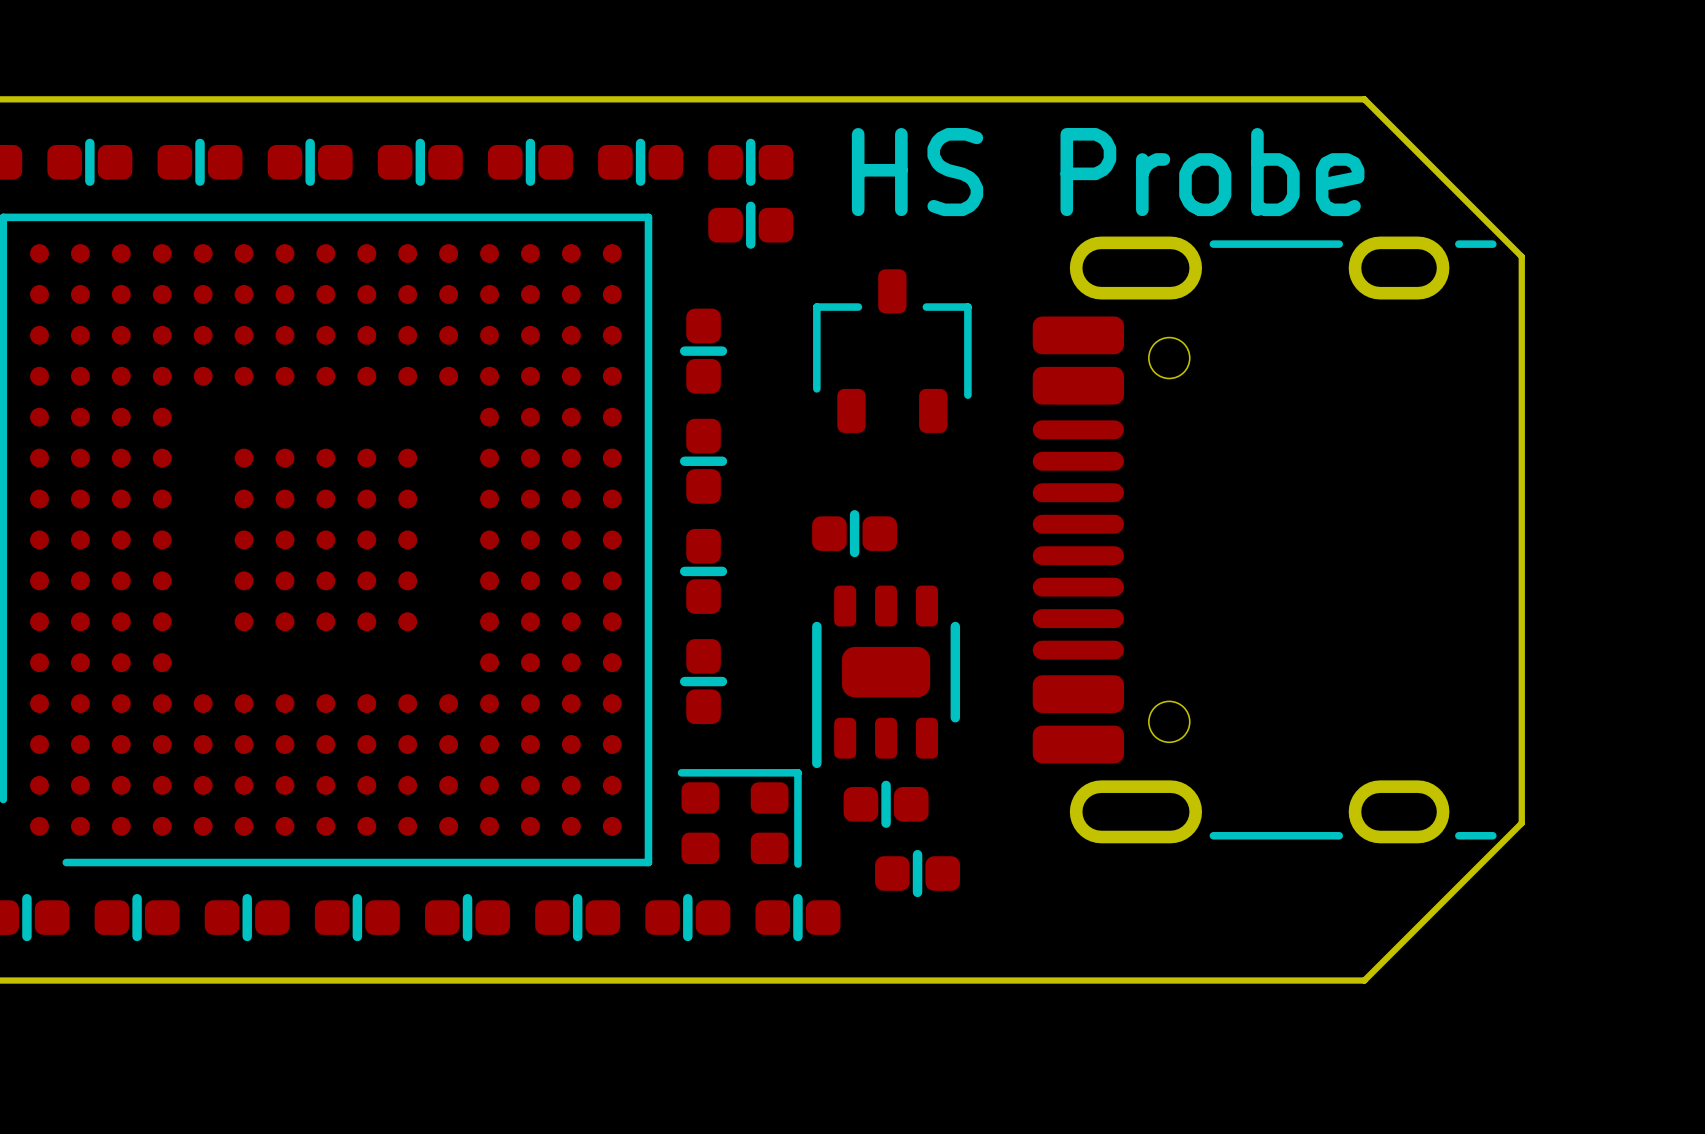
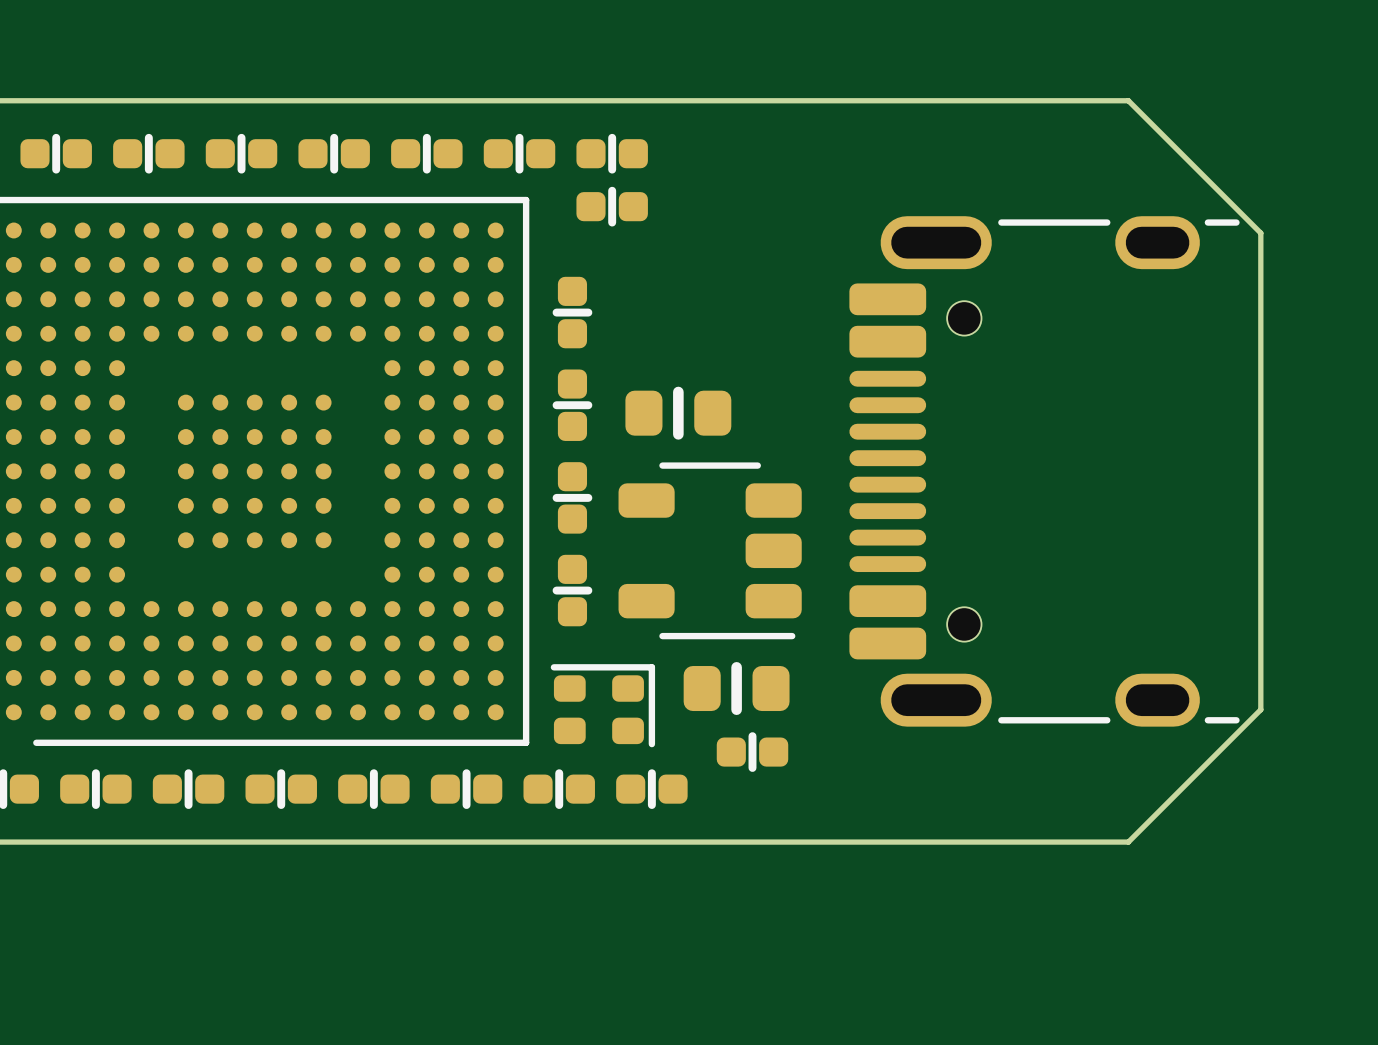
text: HS Probe (1108, 172) -> none
part: (892, 351) -> none
part: none -> (678, 413)
part: (854, 533) -> none
part footprint: [812, 585, 961, 769] -> [618, 462, 802, 640]
part footprint: [843, 780, 929, 828] -> [683, 662, 790, 715]

